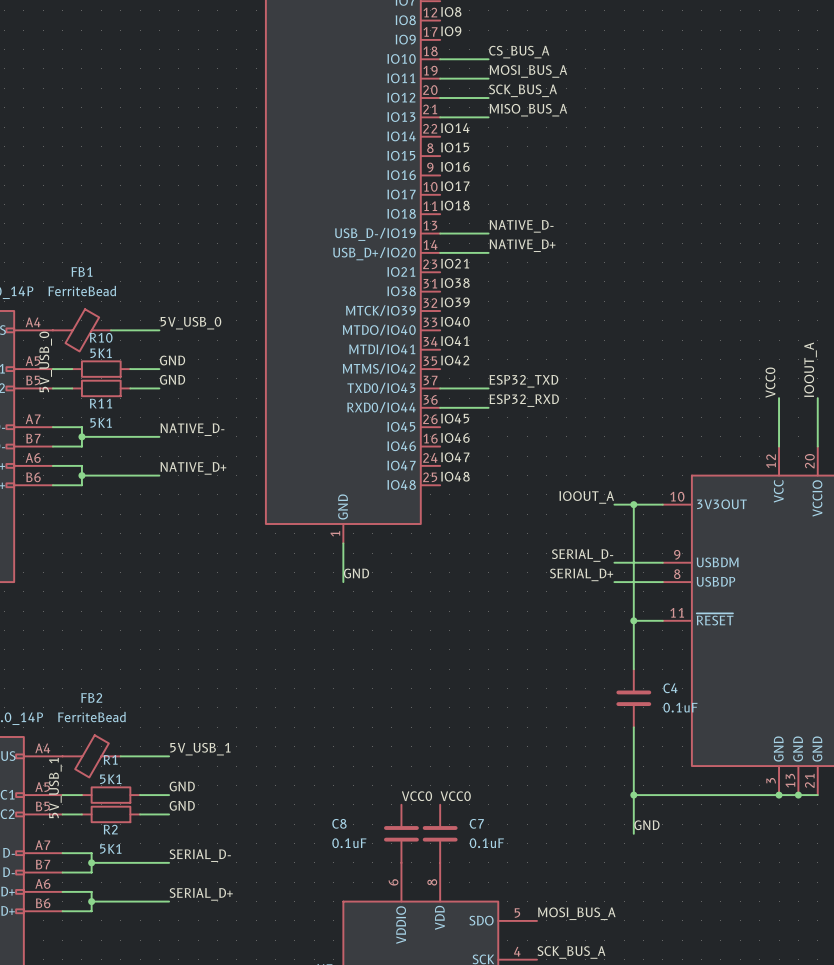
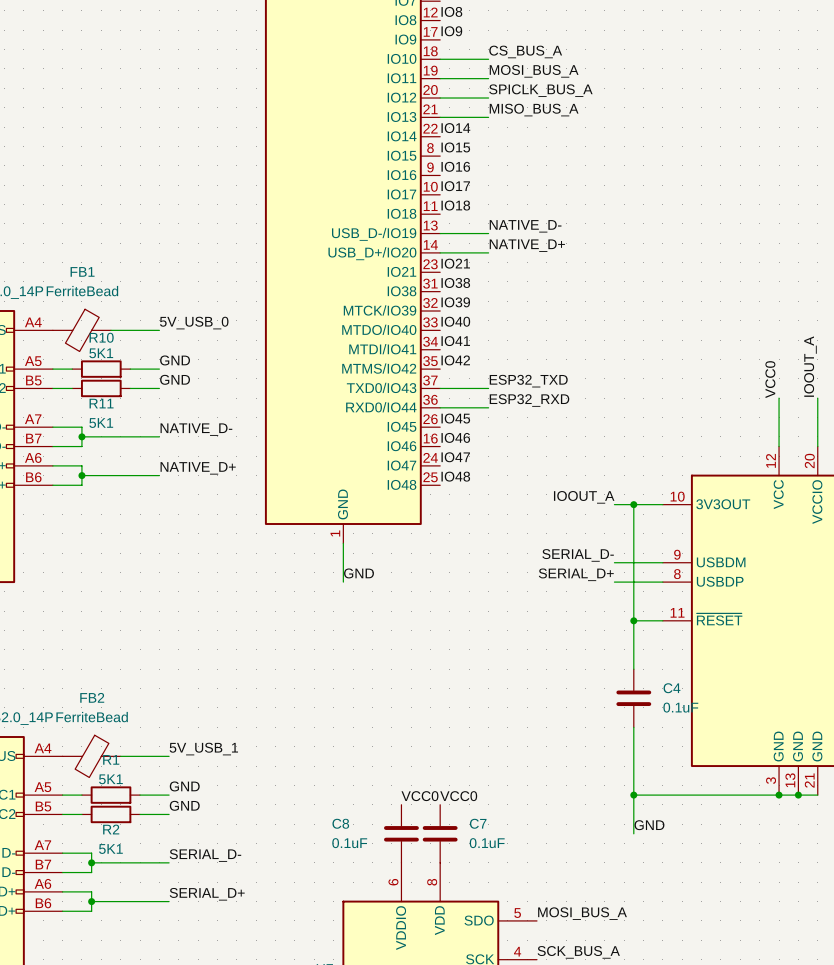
label: SCK_BUS_A (523, 90) -> SPICLK_BUS_A (540, 90)
label: 5V_USB_0 (45, 361) -> none
label: 5V_USB_1 (55, 788) -> none

